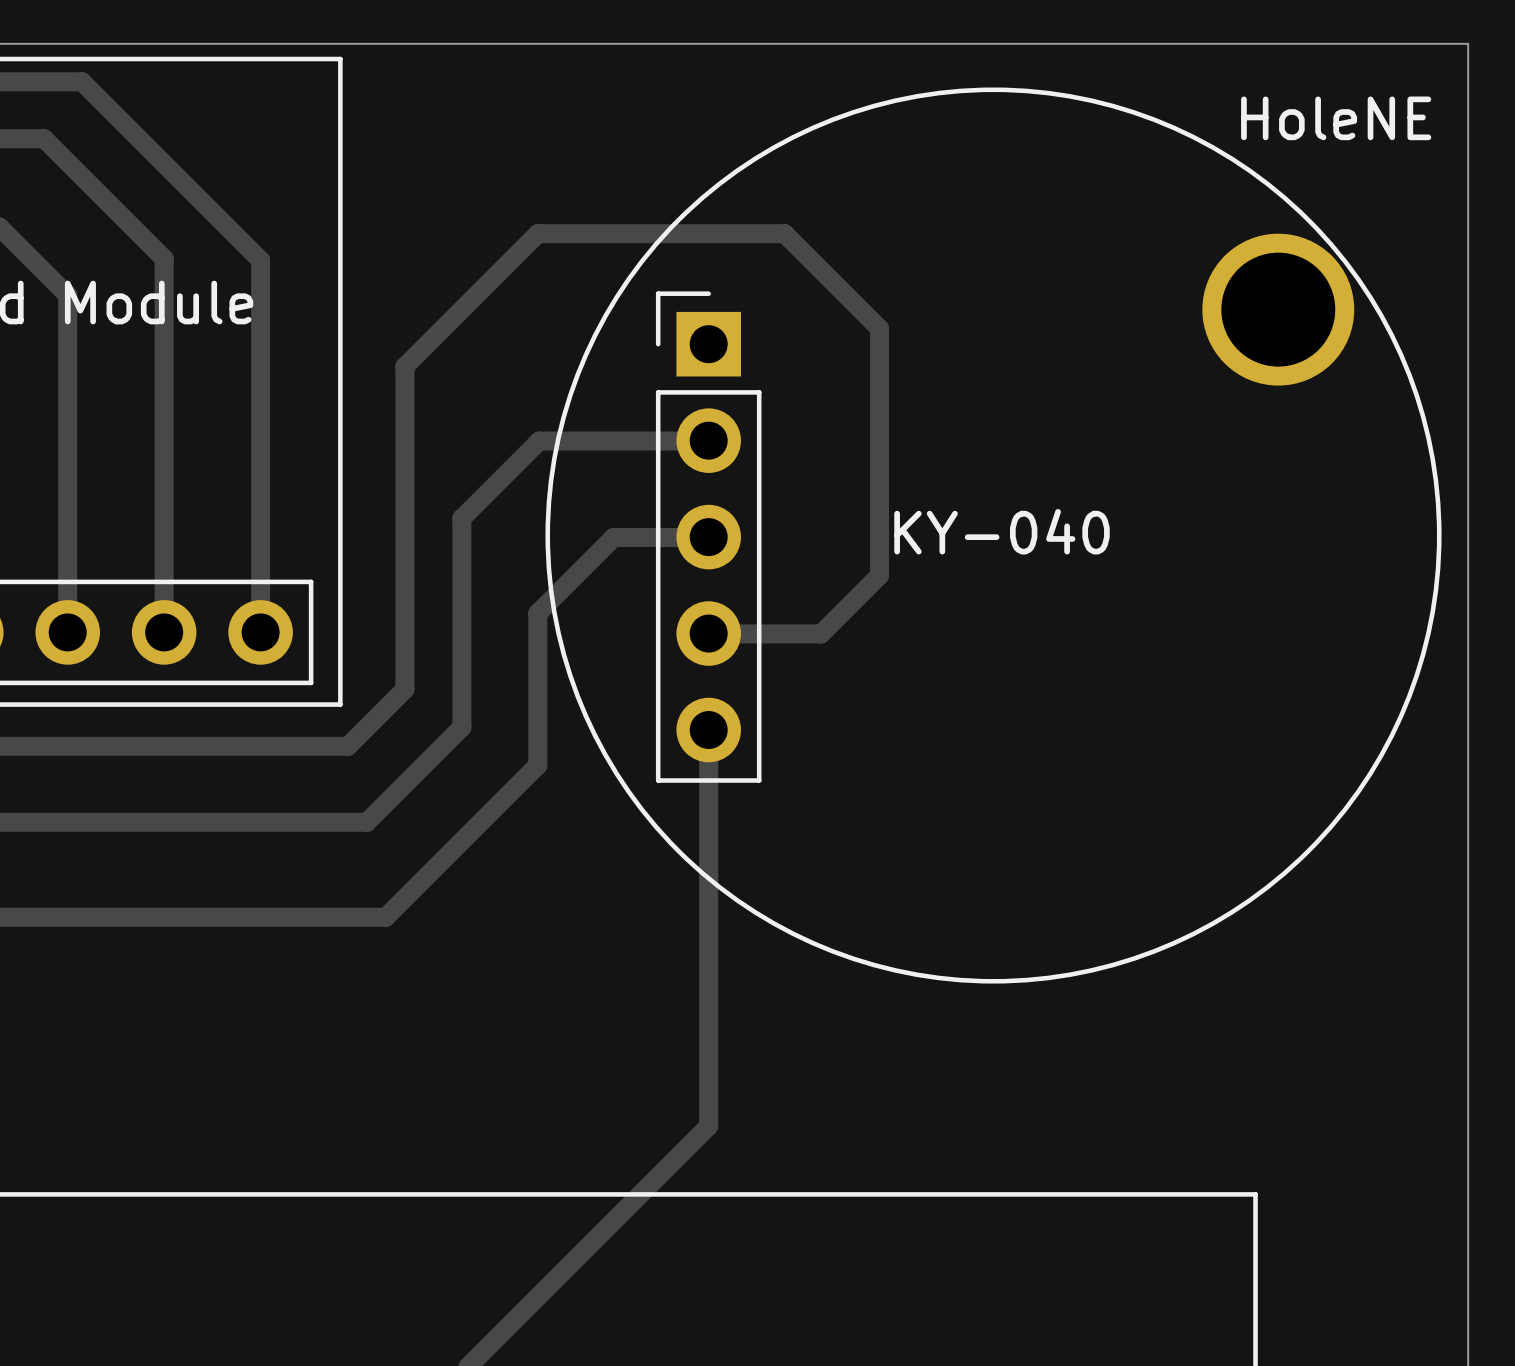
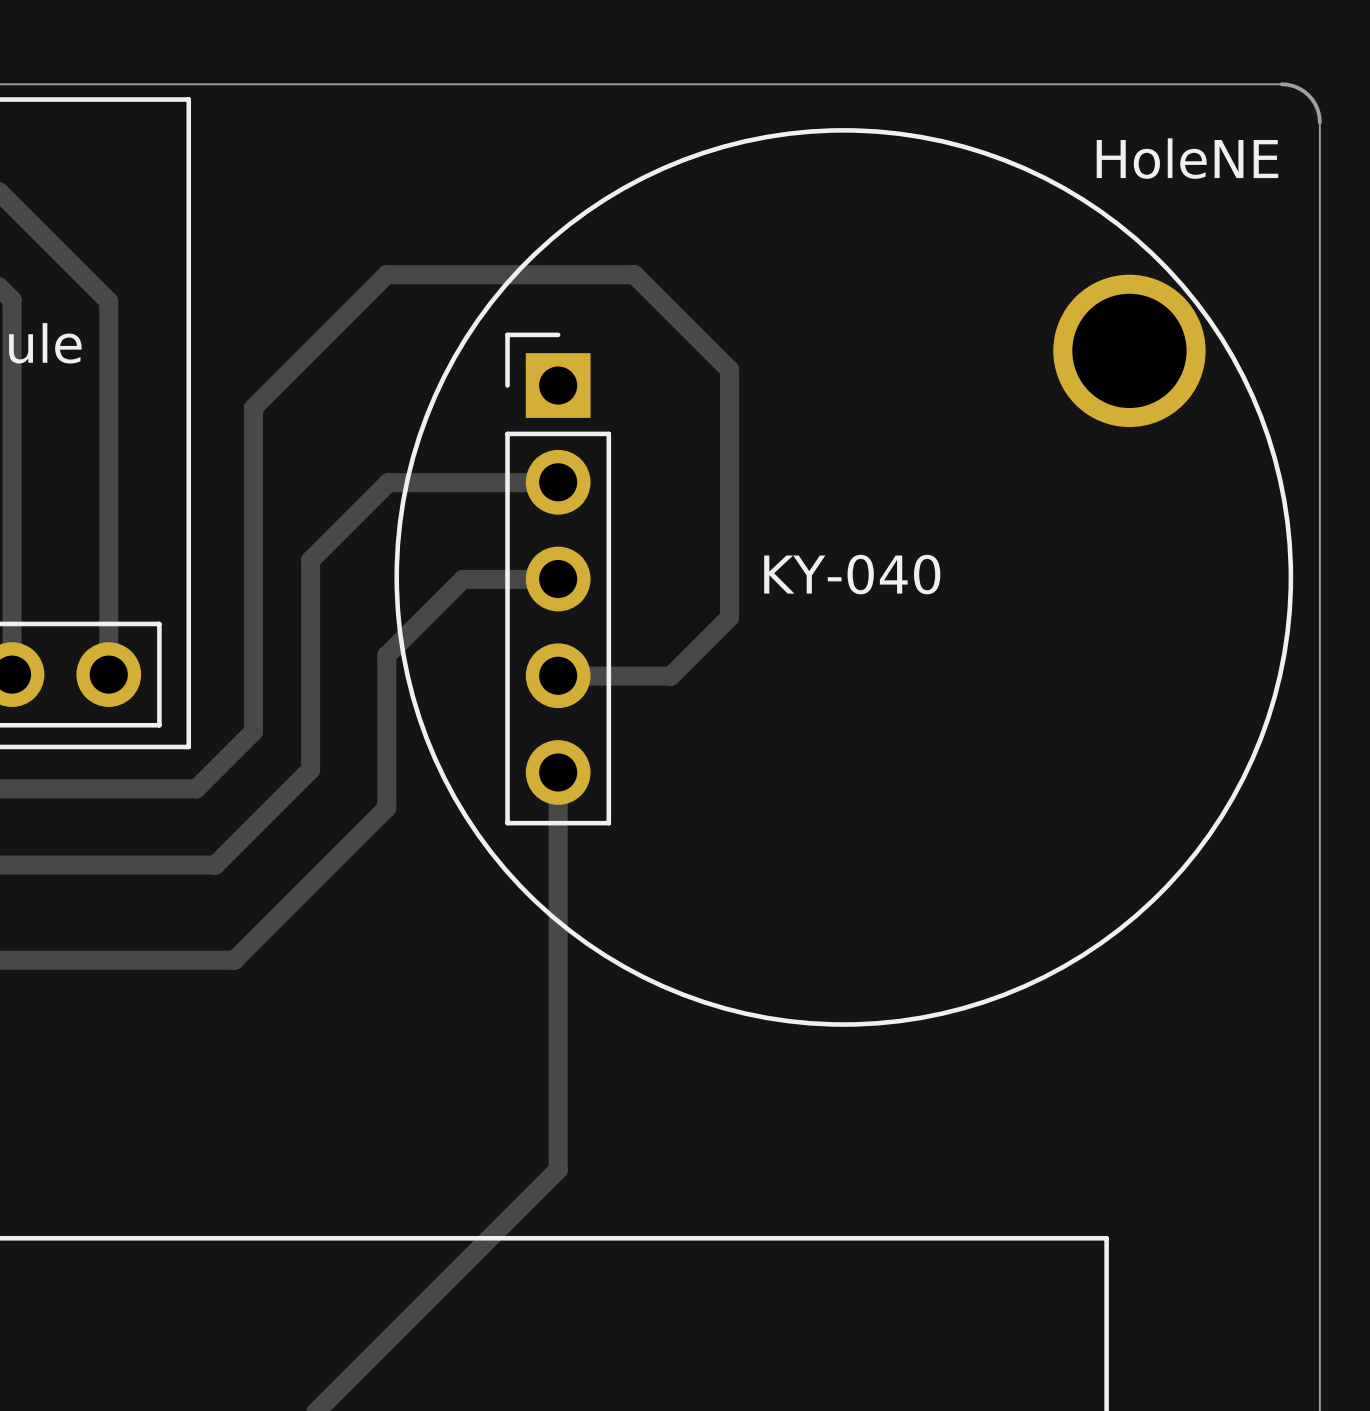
board edge: (1430, 43) (1468, 43) (1468, 81) -> (1281, 84) (1296, 87) (1308, 95) (1316, 107) (1319, 122)

